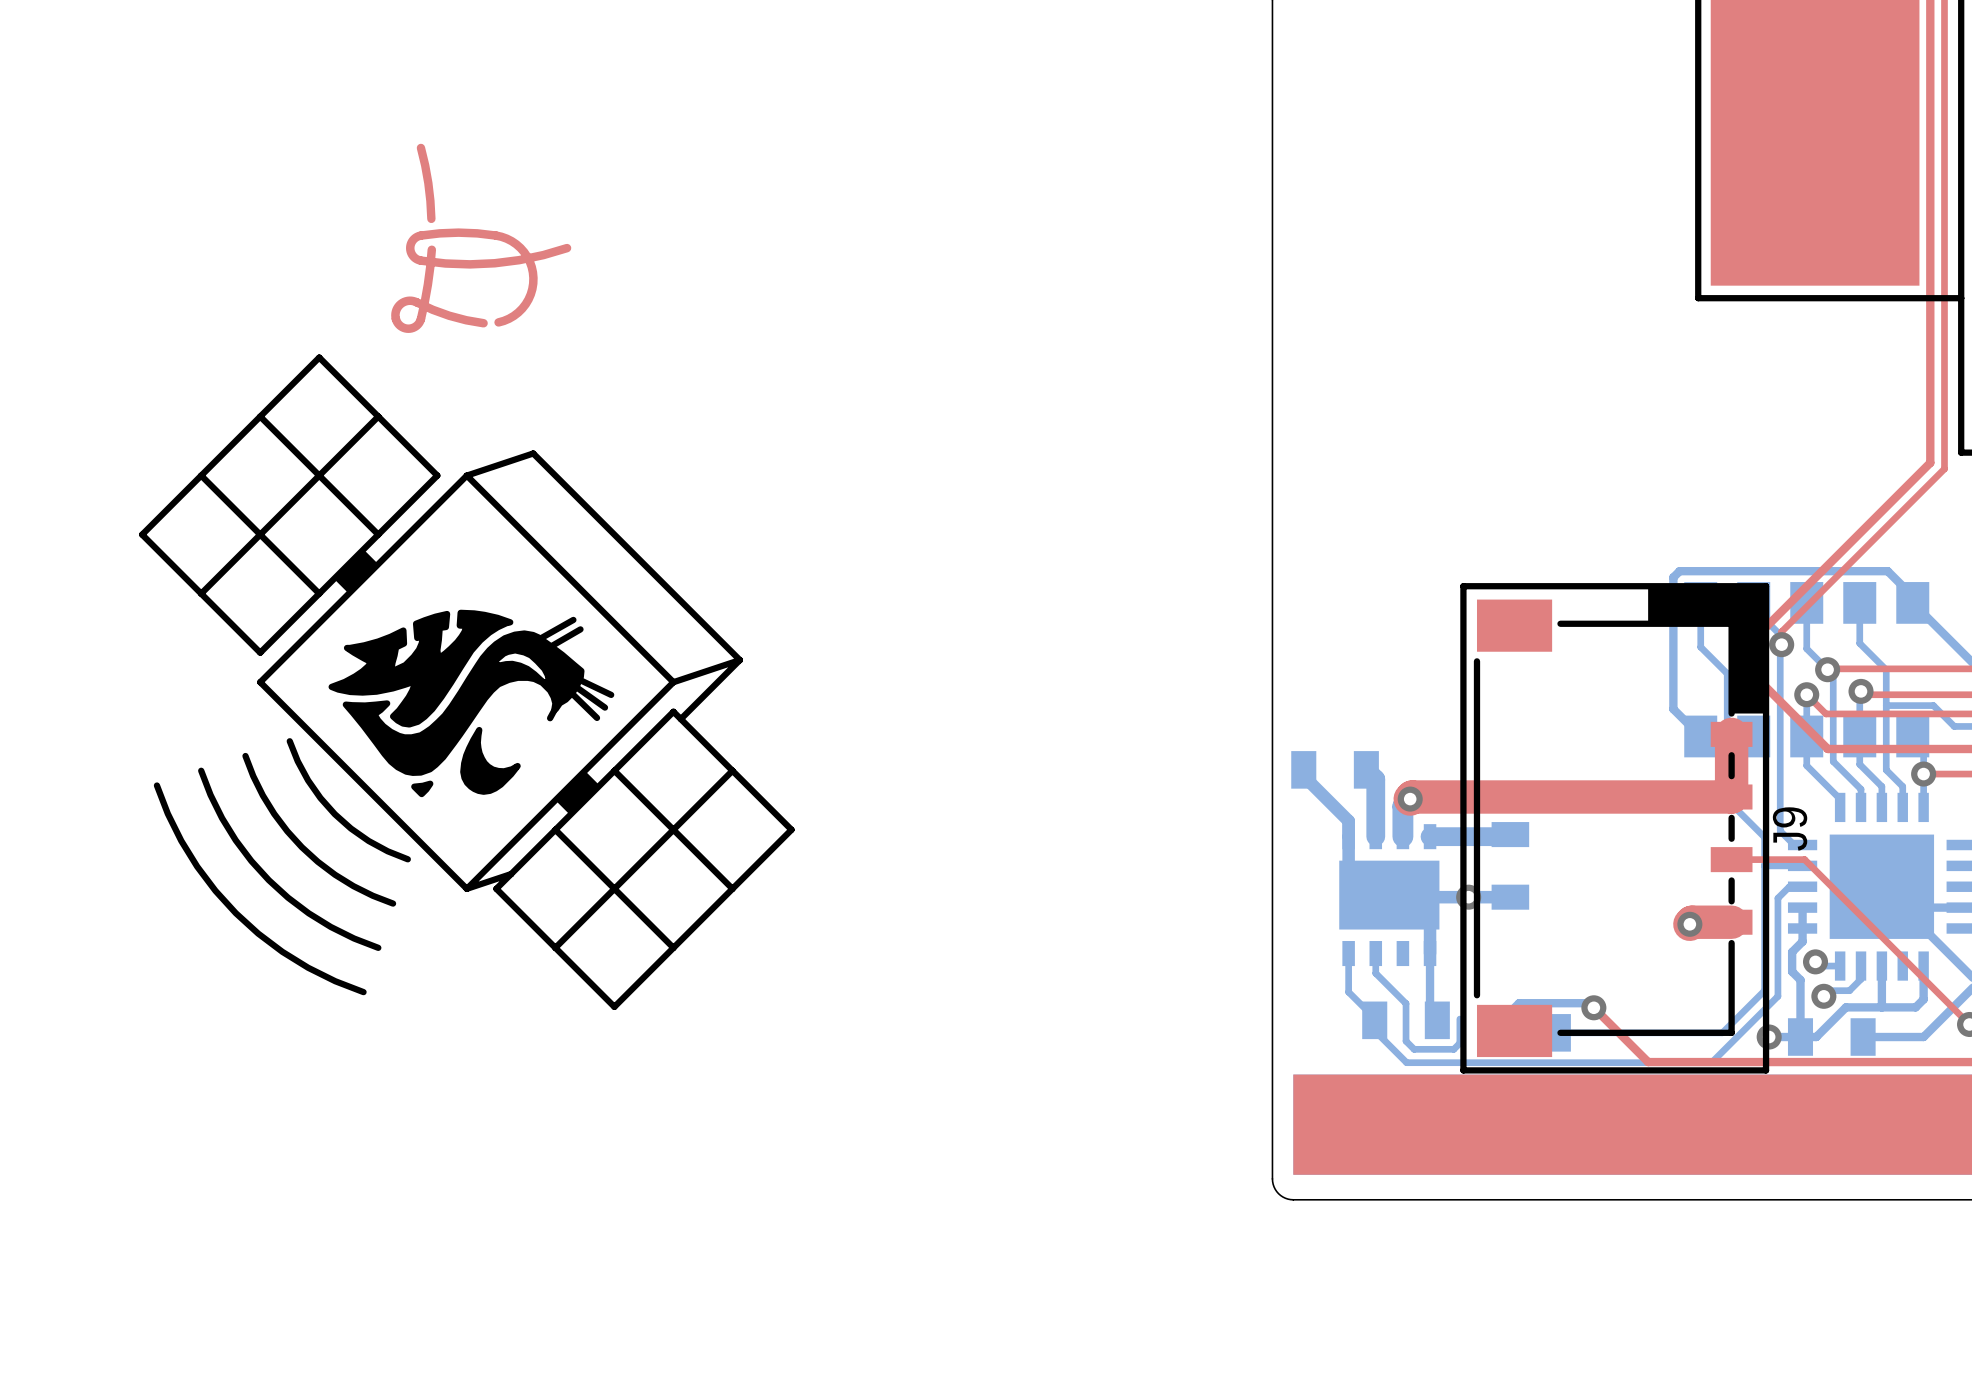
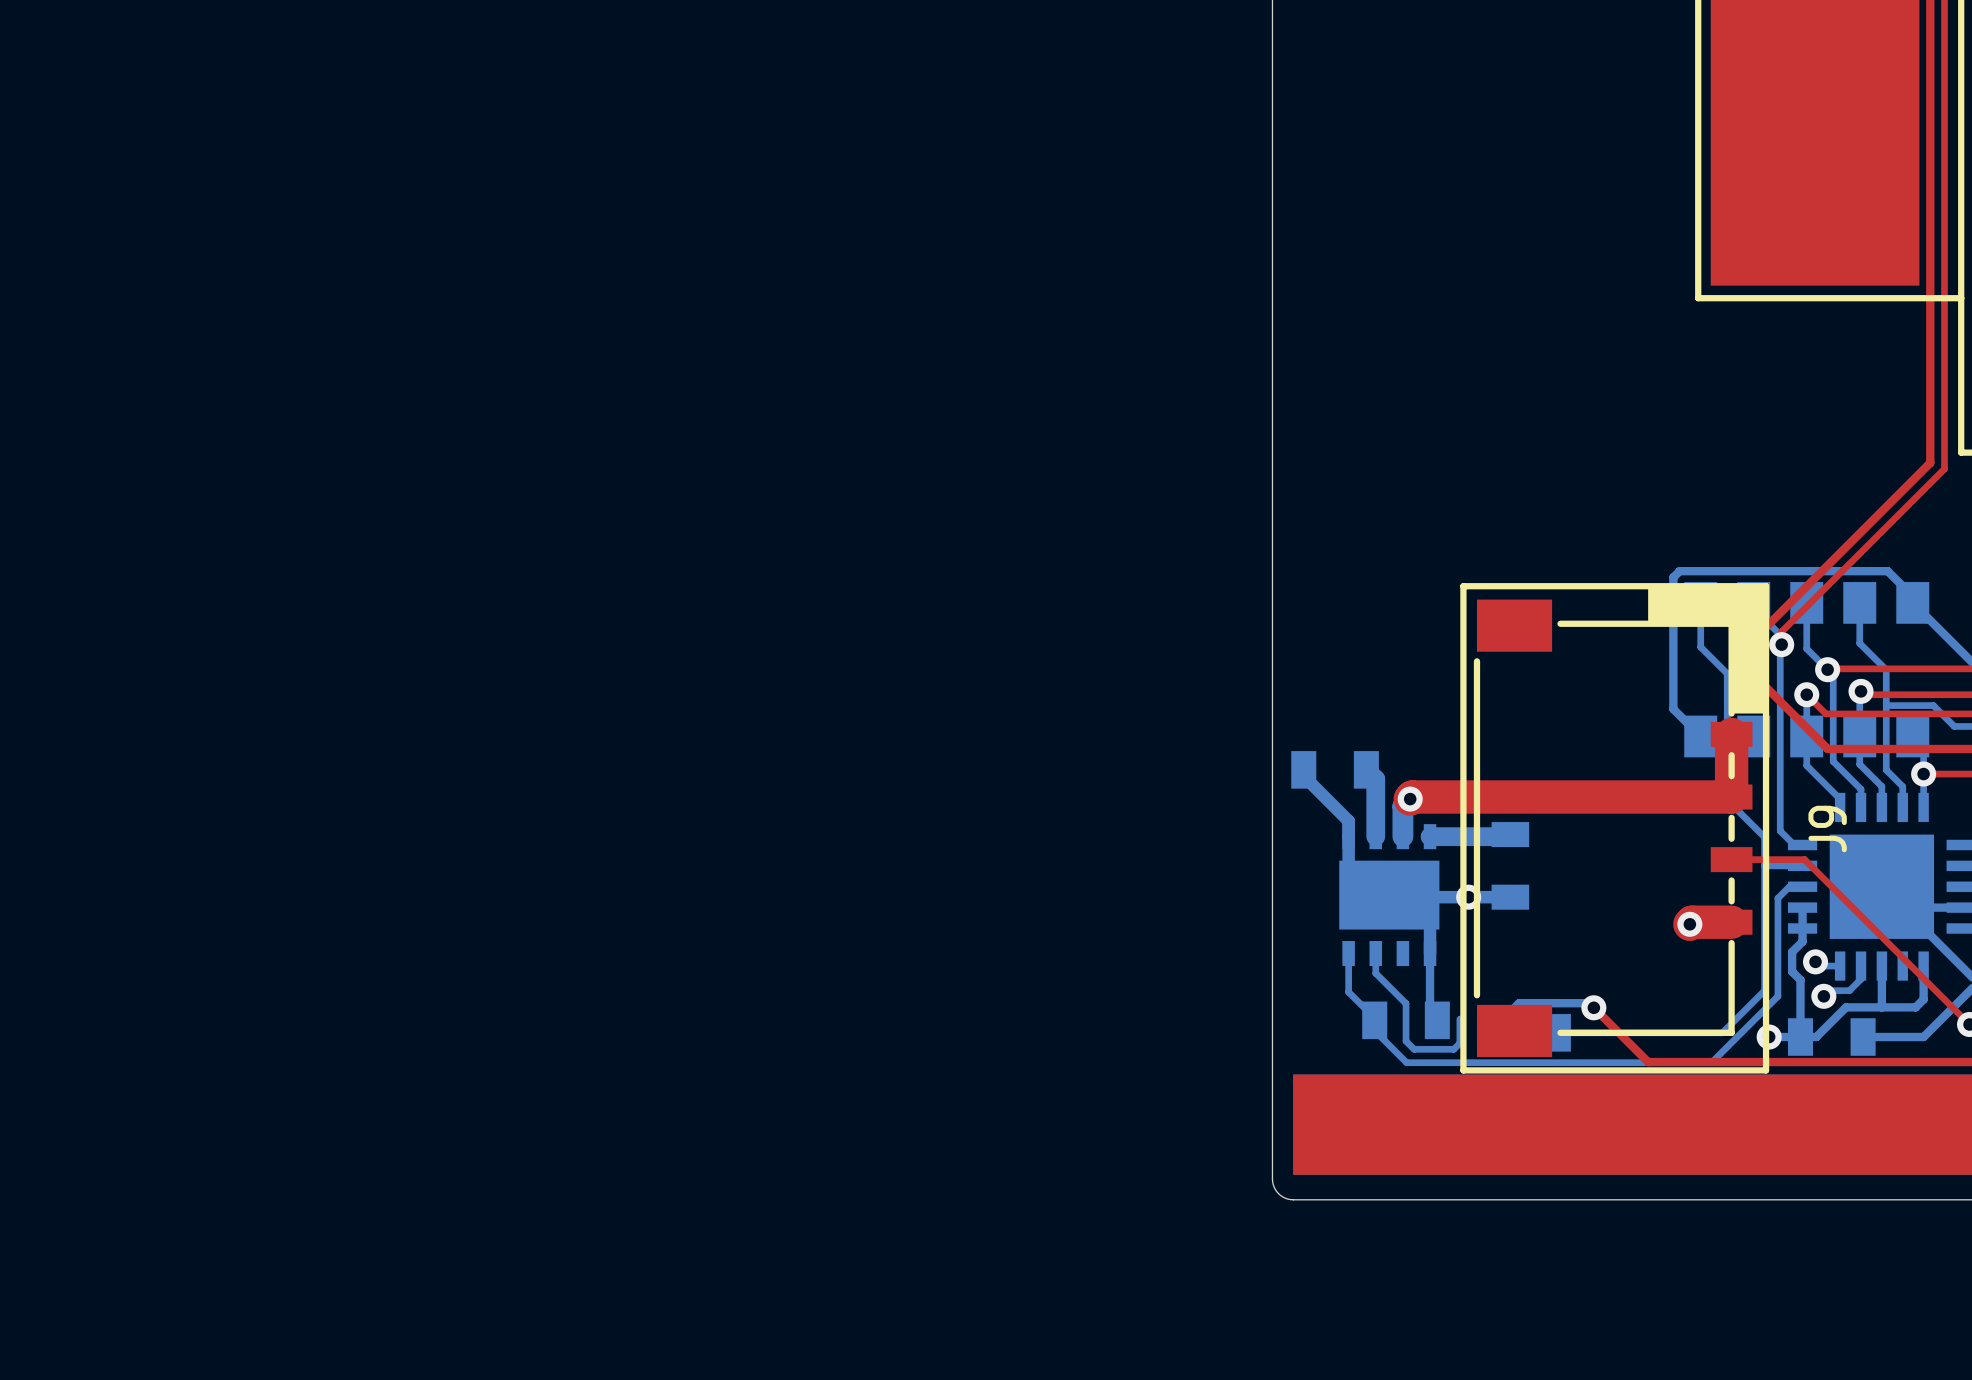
drawing: [139, 143, 795, 1011] -> none
J9 name position: J9 (1790, 829) -> J9 (1827, 829)

